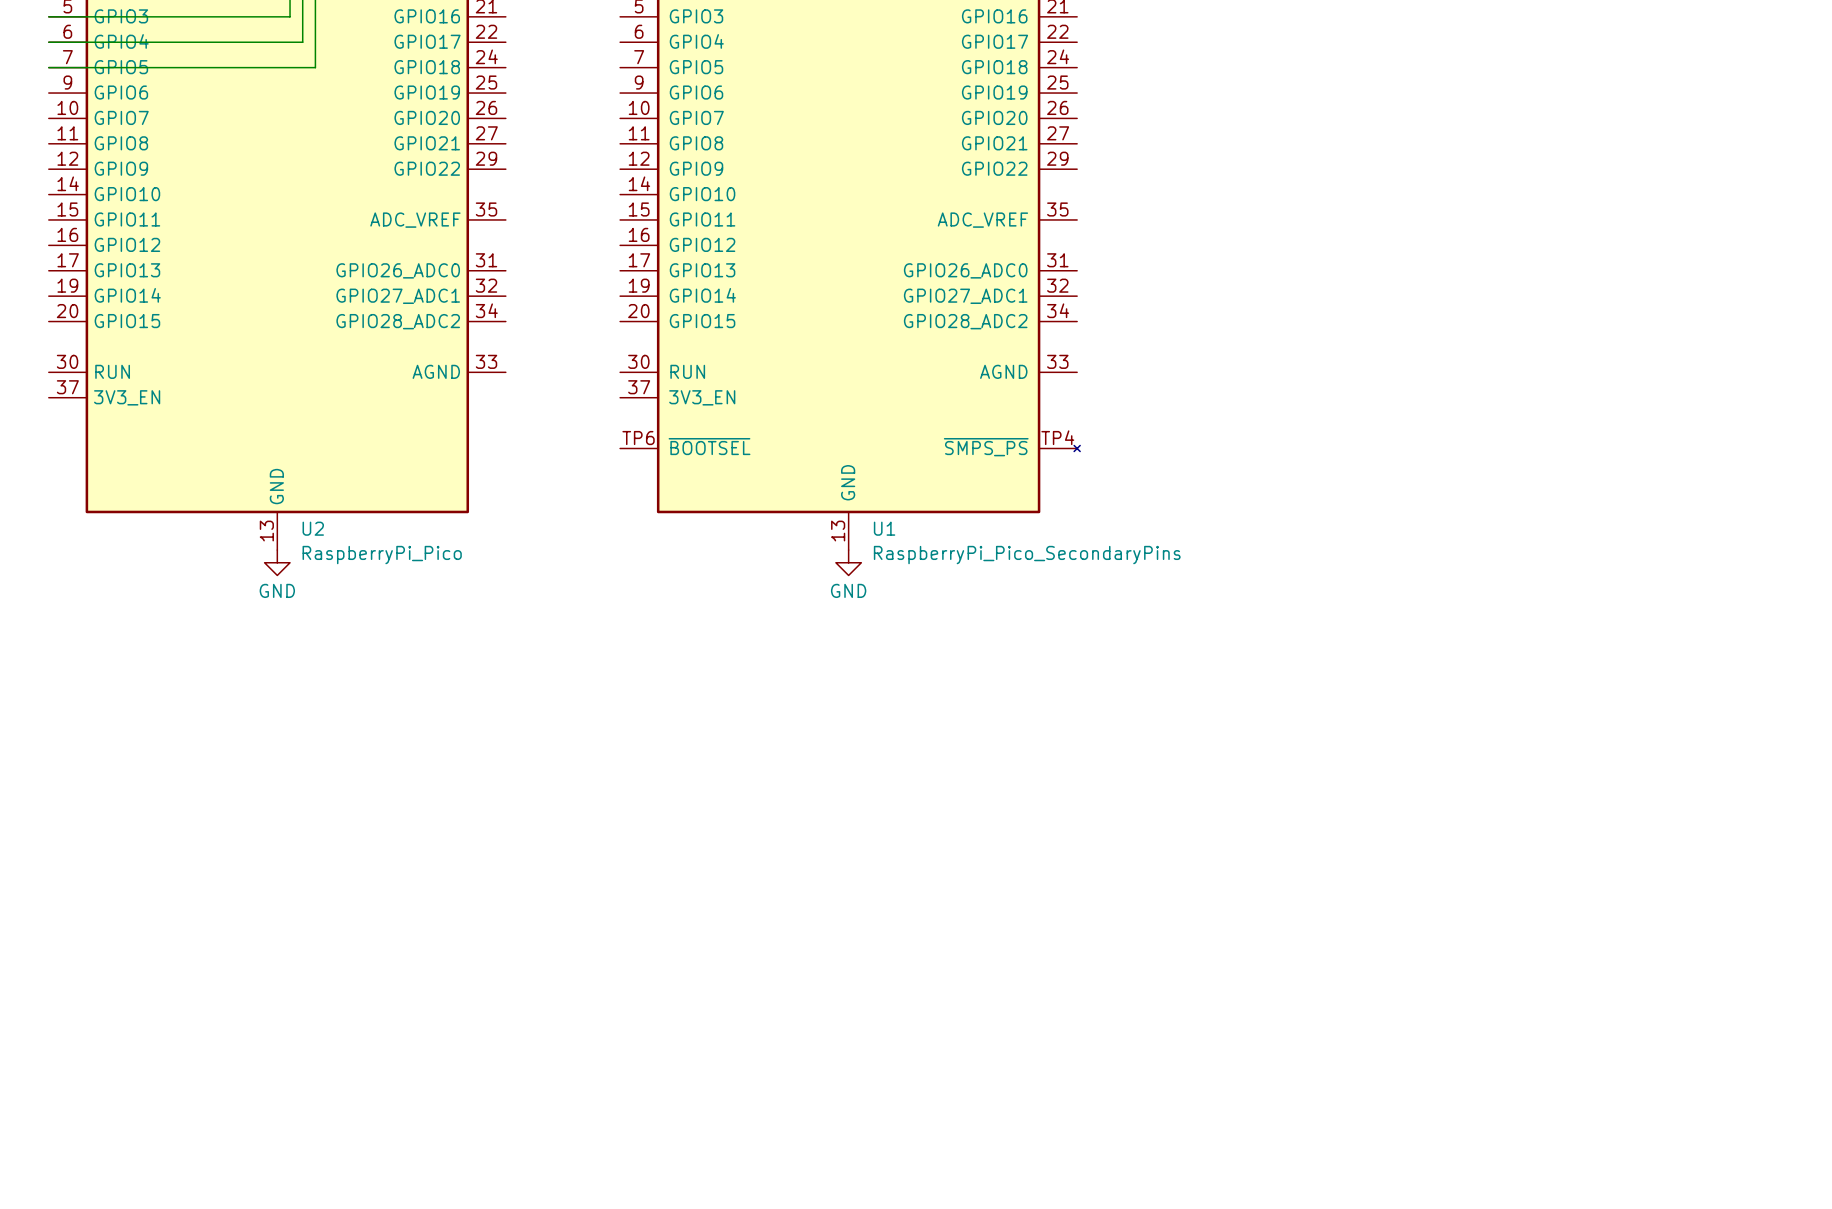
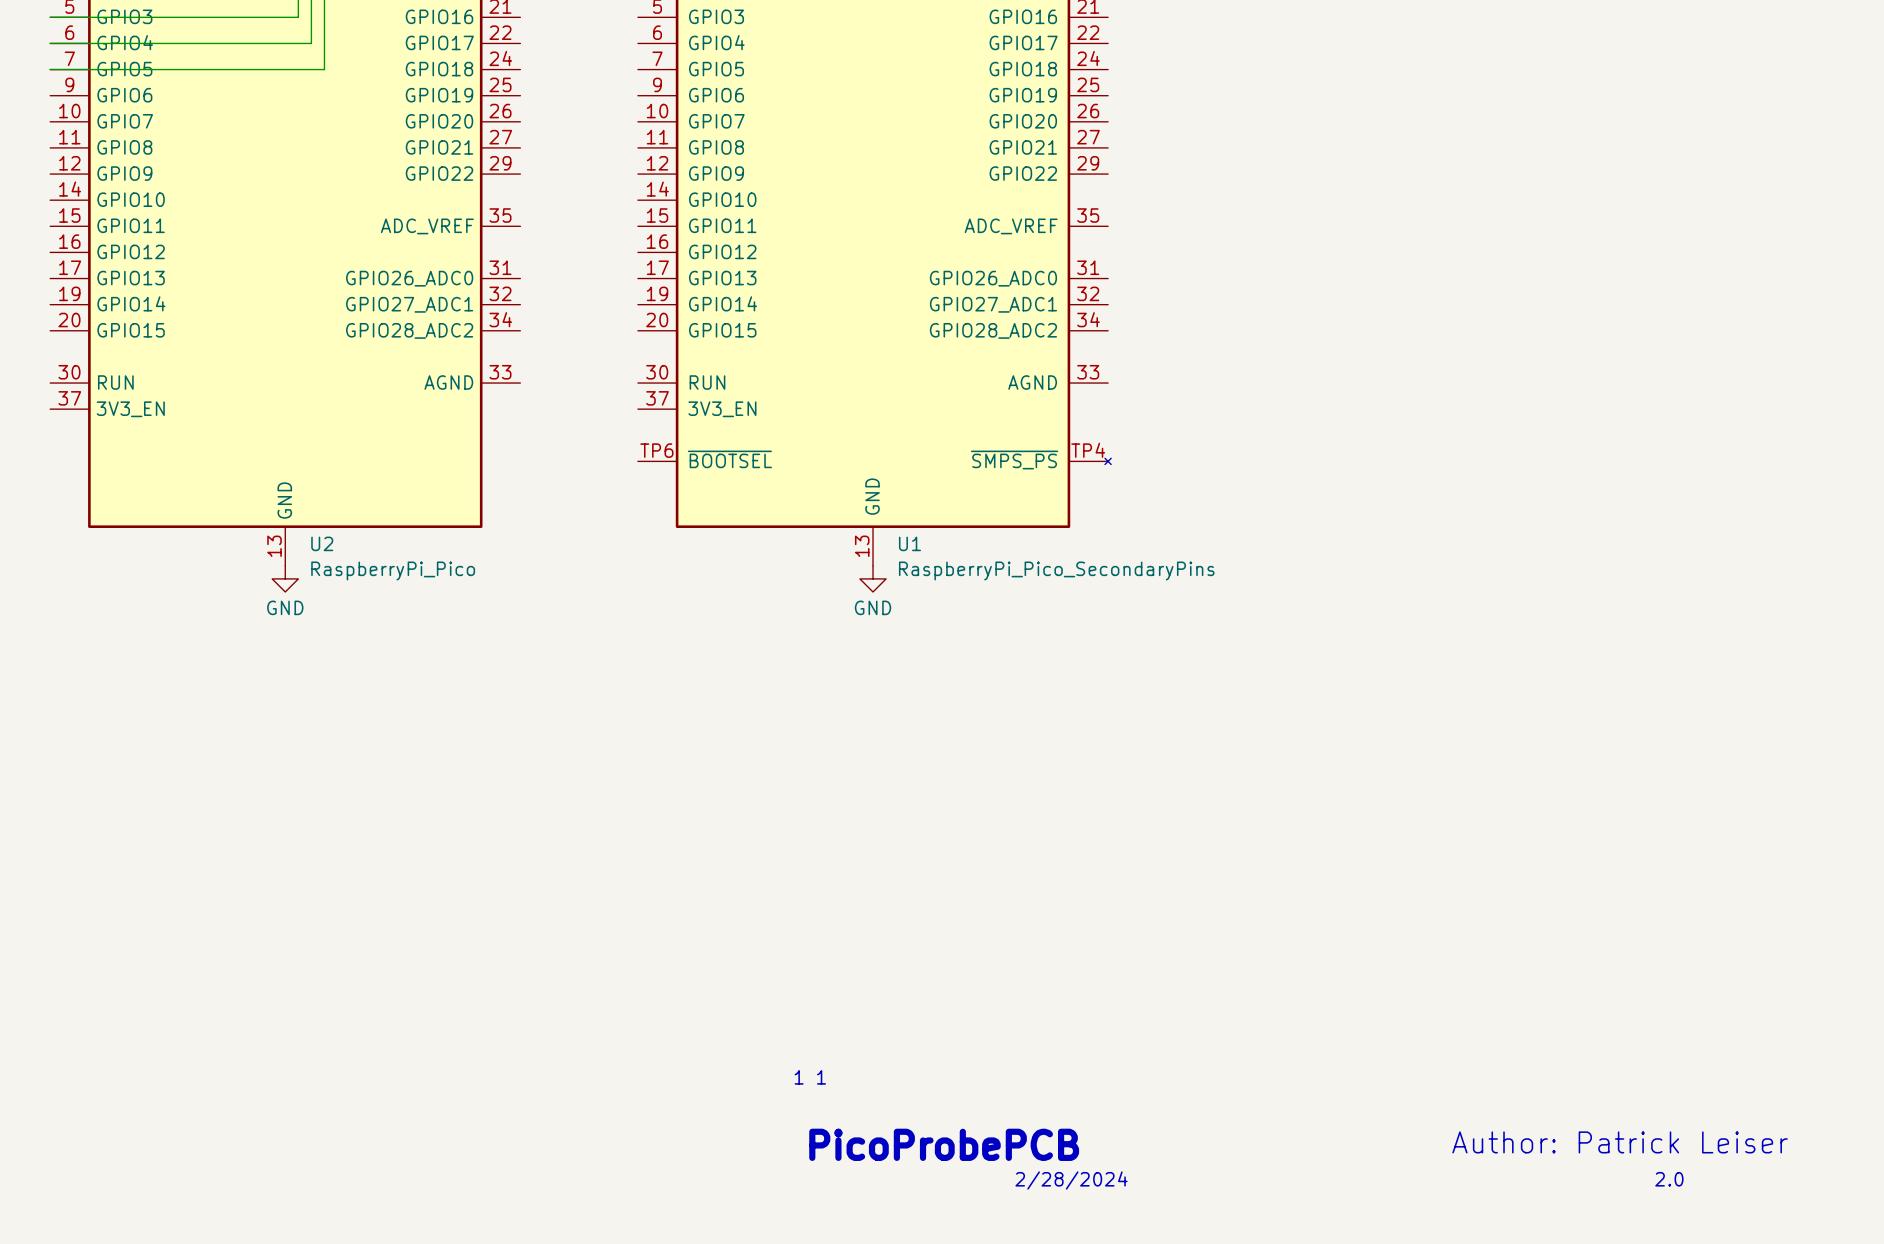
text: none -> 1 1 (810, 1077)
text: none -> Author: Patrick Leiser (1620, 1142)
text: none -> PicoProbePCB (944, 1144)
text: none -> 2.0 (1669, 1179)
text: none -> 2/28/2024 (1071, 1180)

